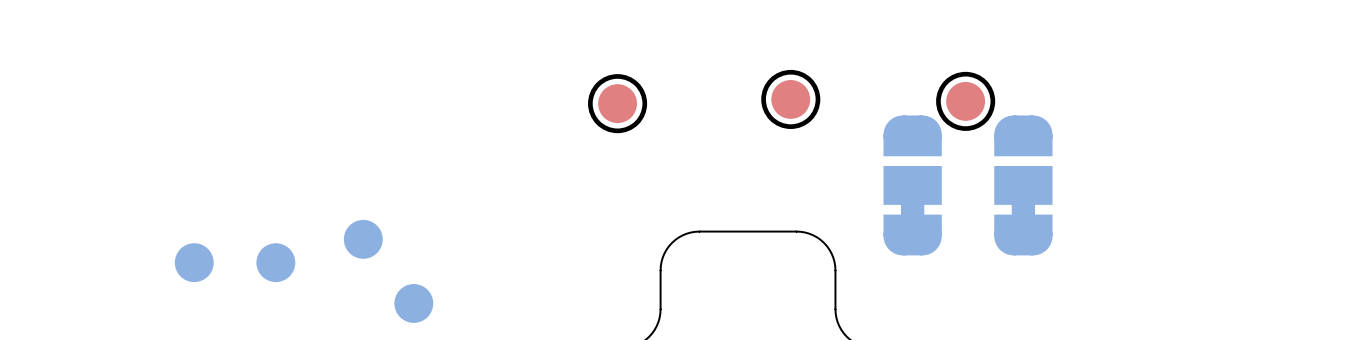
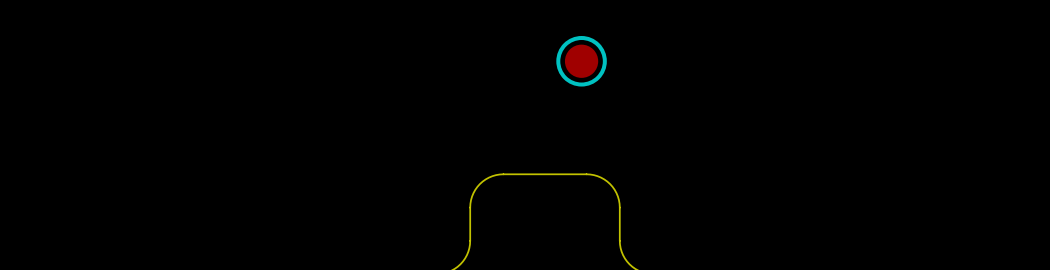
part: (965, 101) -> none
part: (617, 103) -> none
part: (912, 185) -> none
part: (1023, 185) -> none
part: (363, 239) -> none
part: (194, 262) -> none
part: (275, 262) -> none
part: (413, 303) -> none

